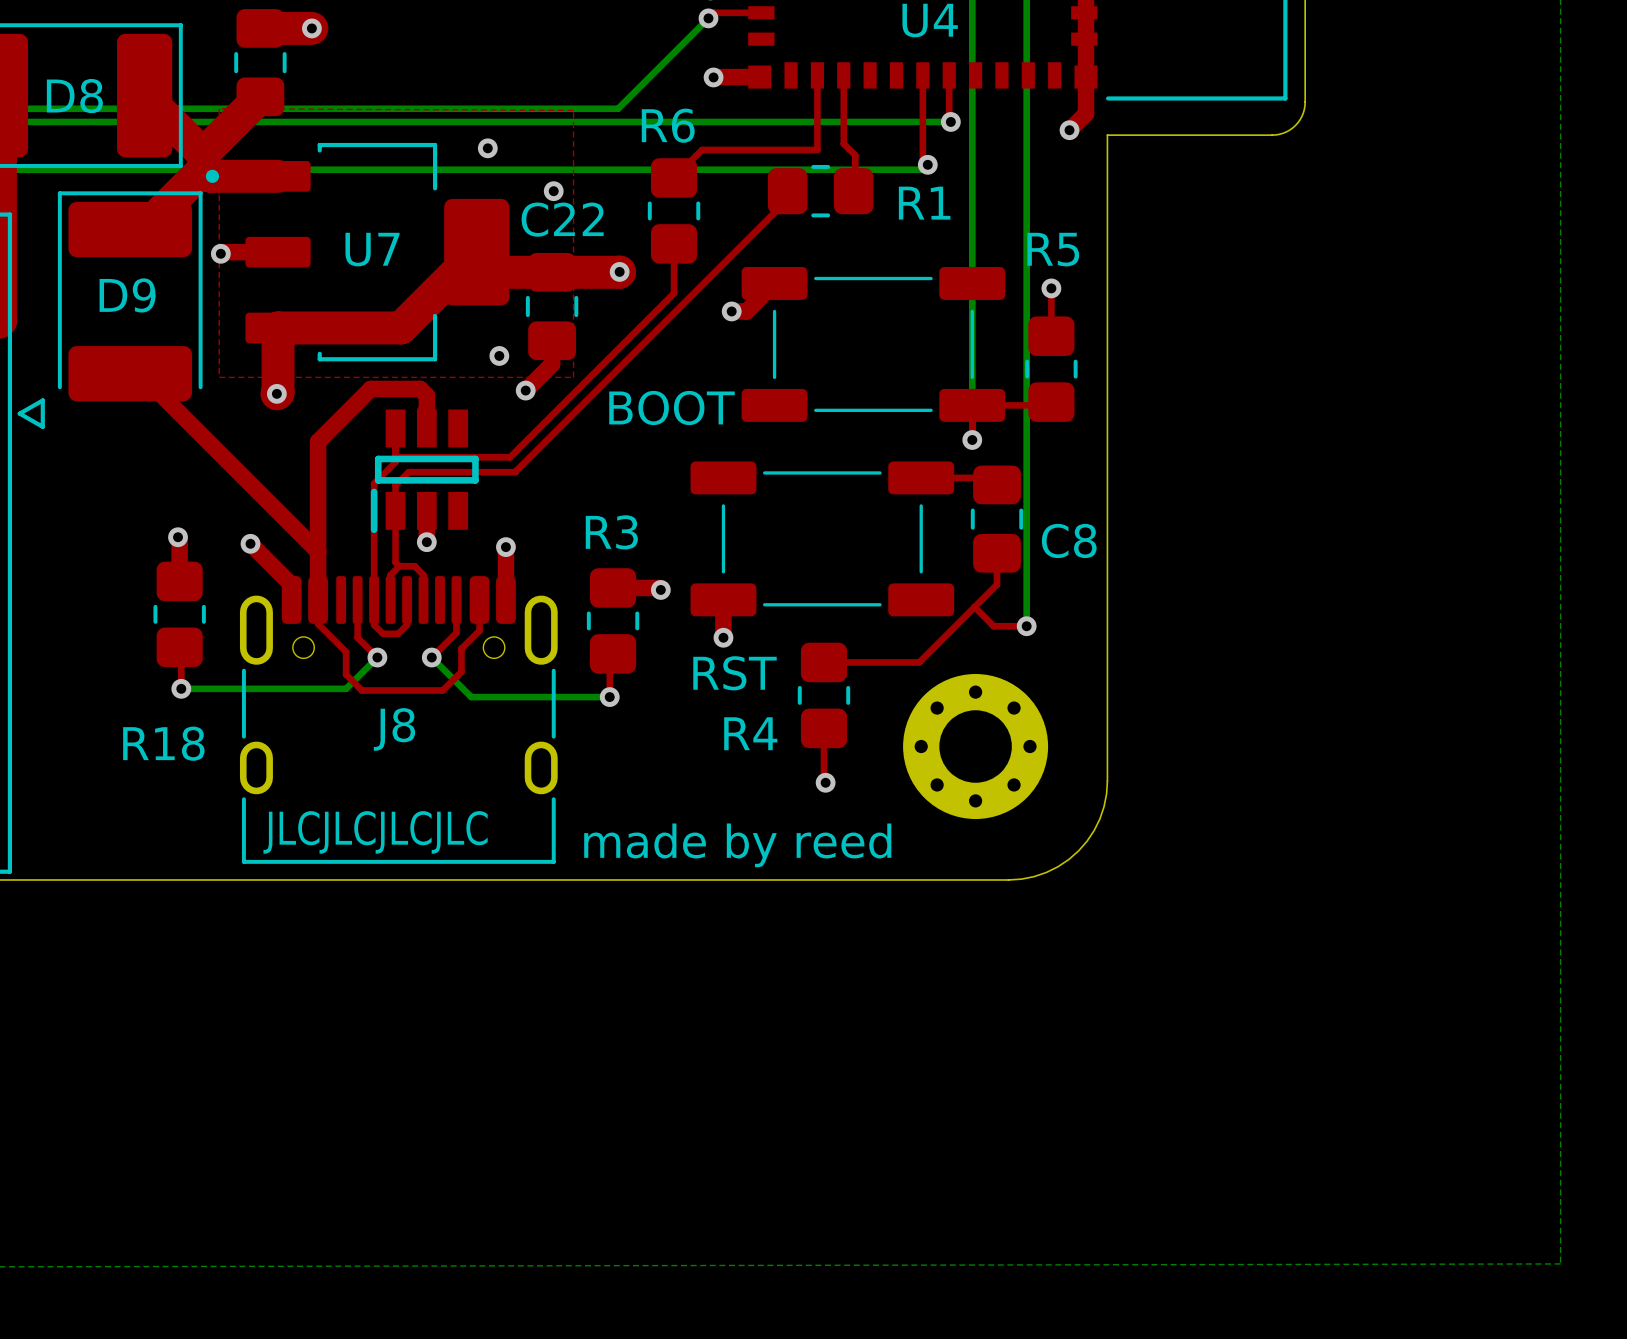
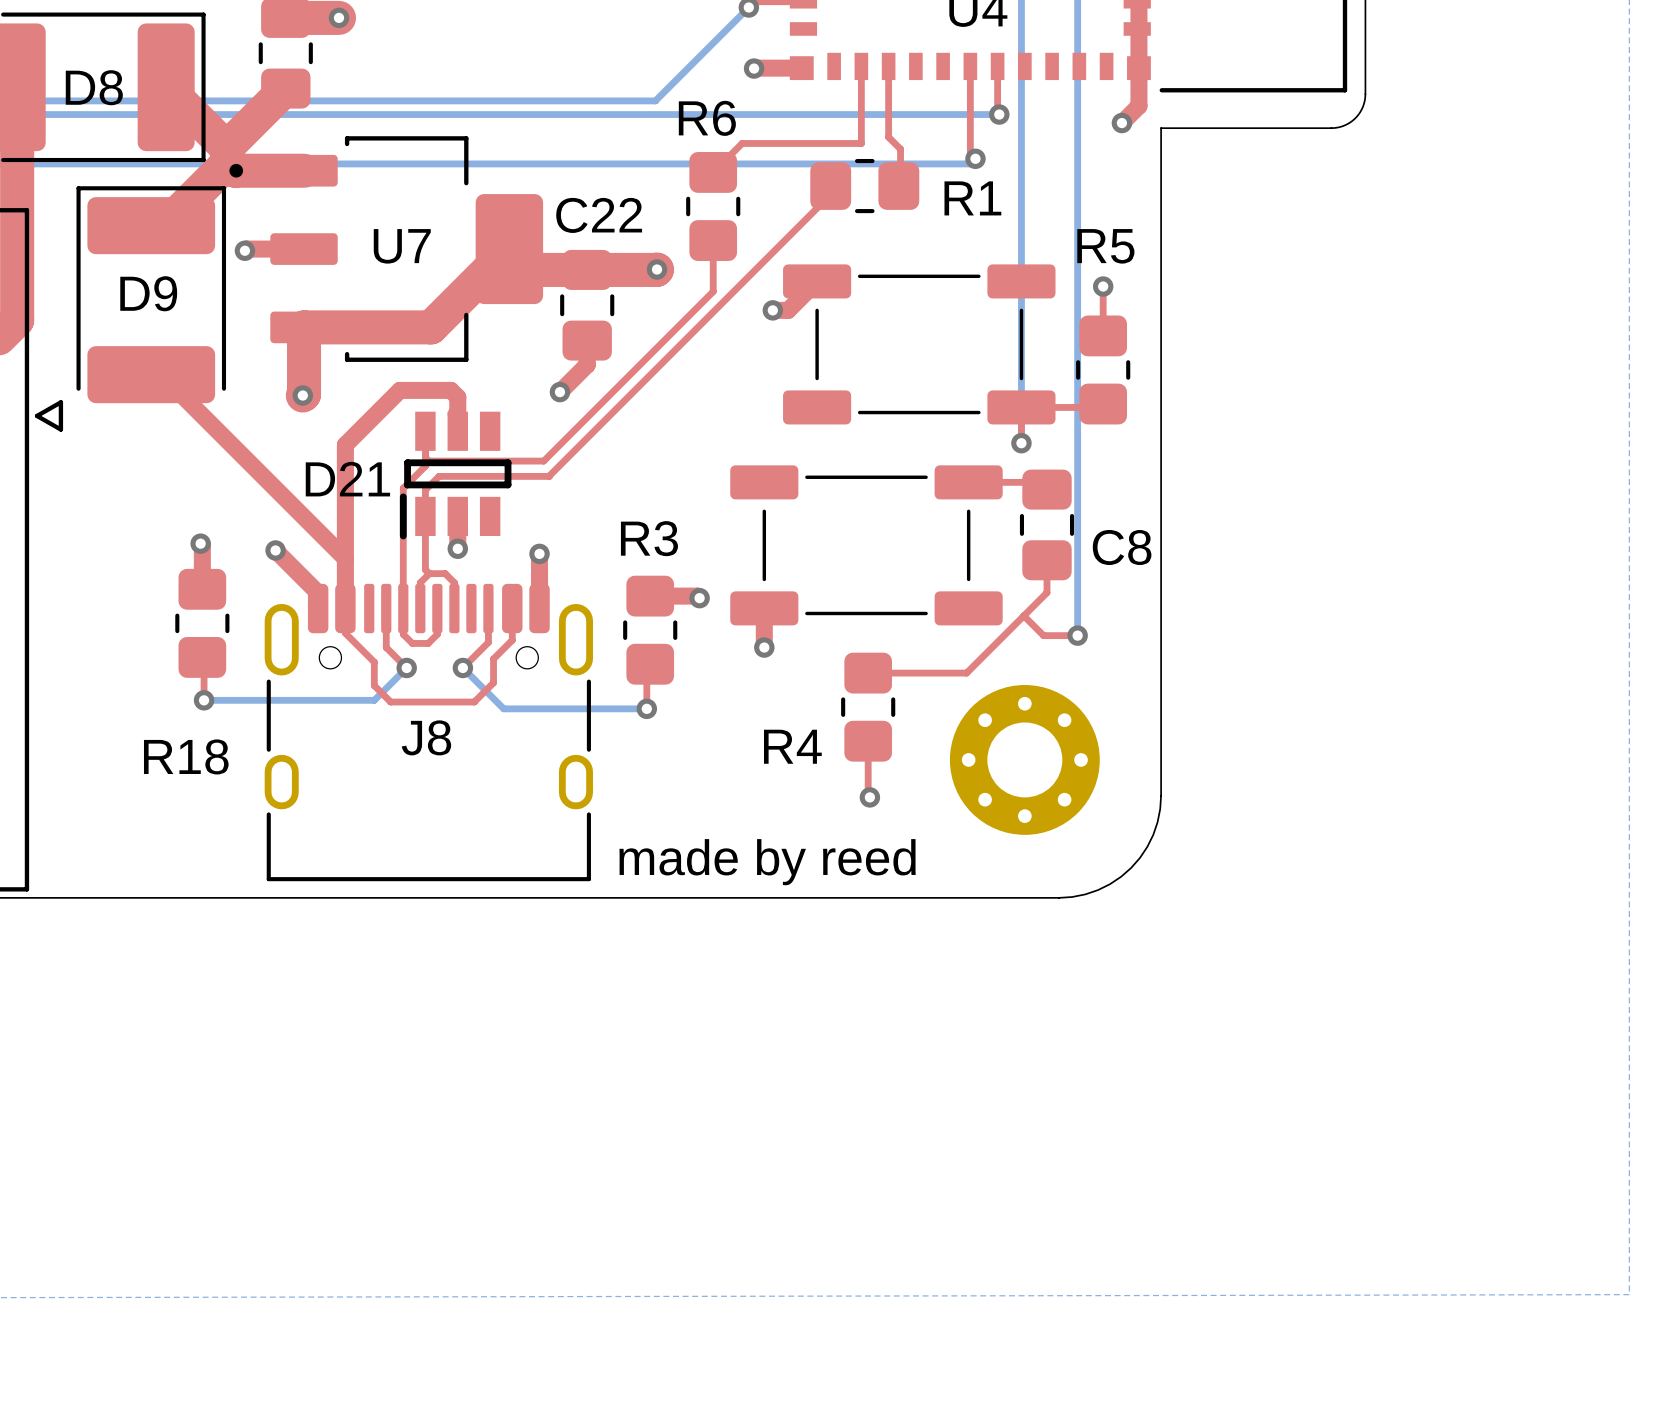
top zone outline: (219, 108) (219, 377) (573, 377) (573, 110) (219, 108) -> none
via: (487, 148) -> none
via: (553, 191) -> none
via: (499, 355) -> none
text: BOOT (671, 407) -> none
D21 name: none -> D21 (347, 479)
text: RST (735, 673) -> none
text: JLCJLCJLCJLC (375, 832) -> none

